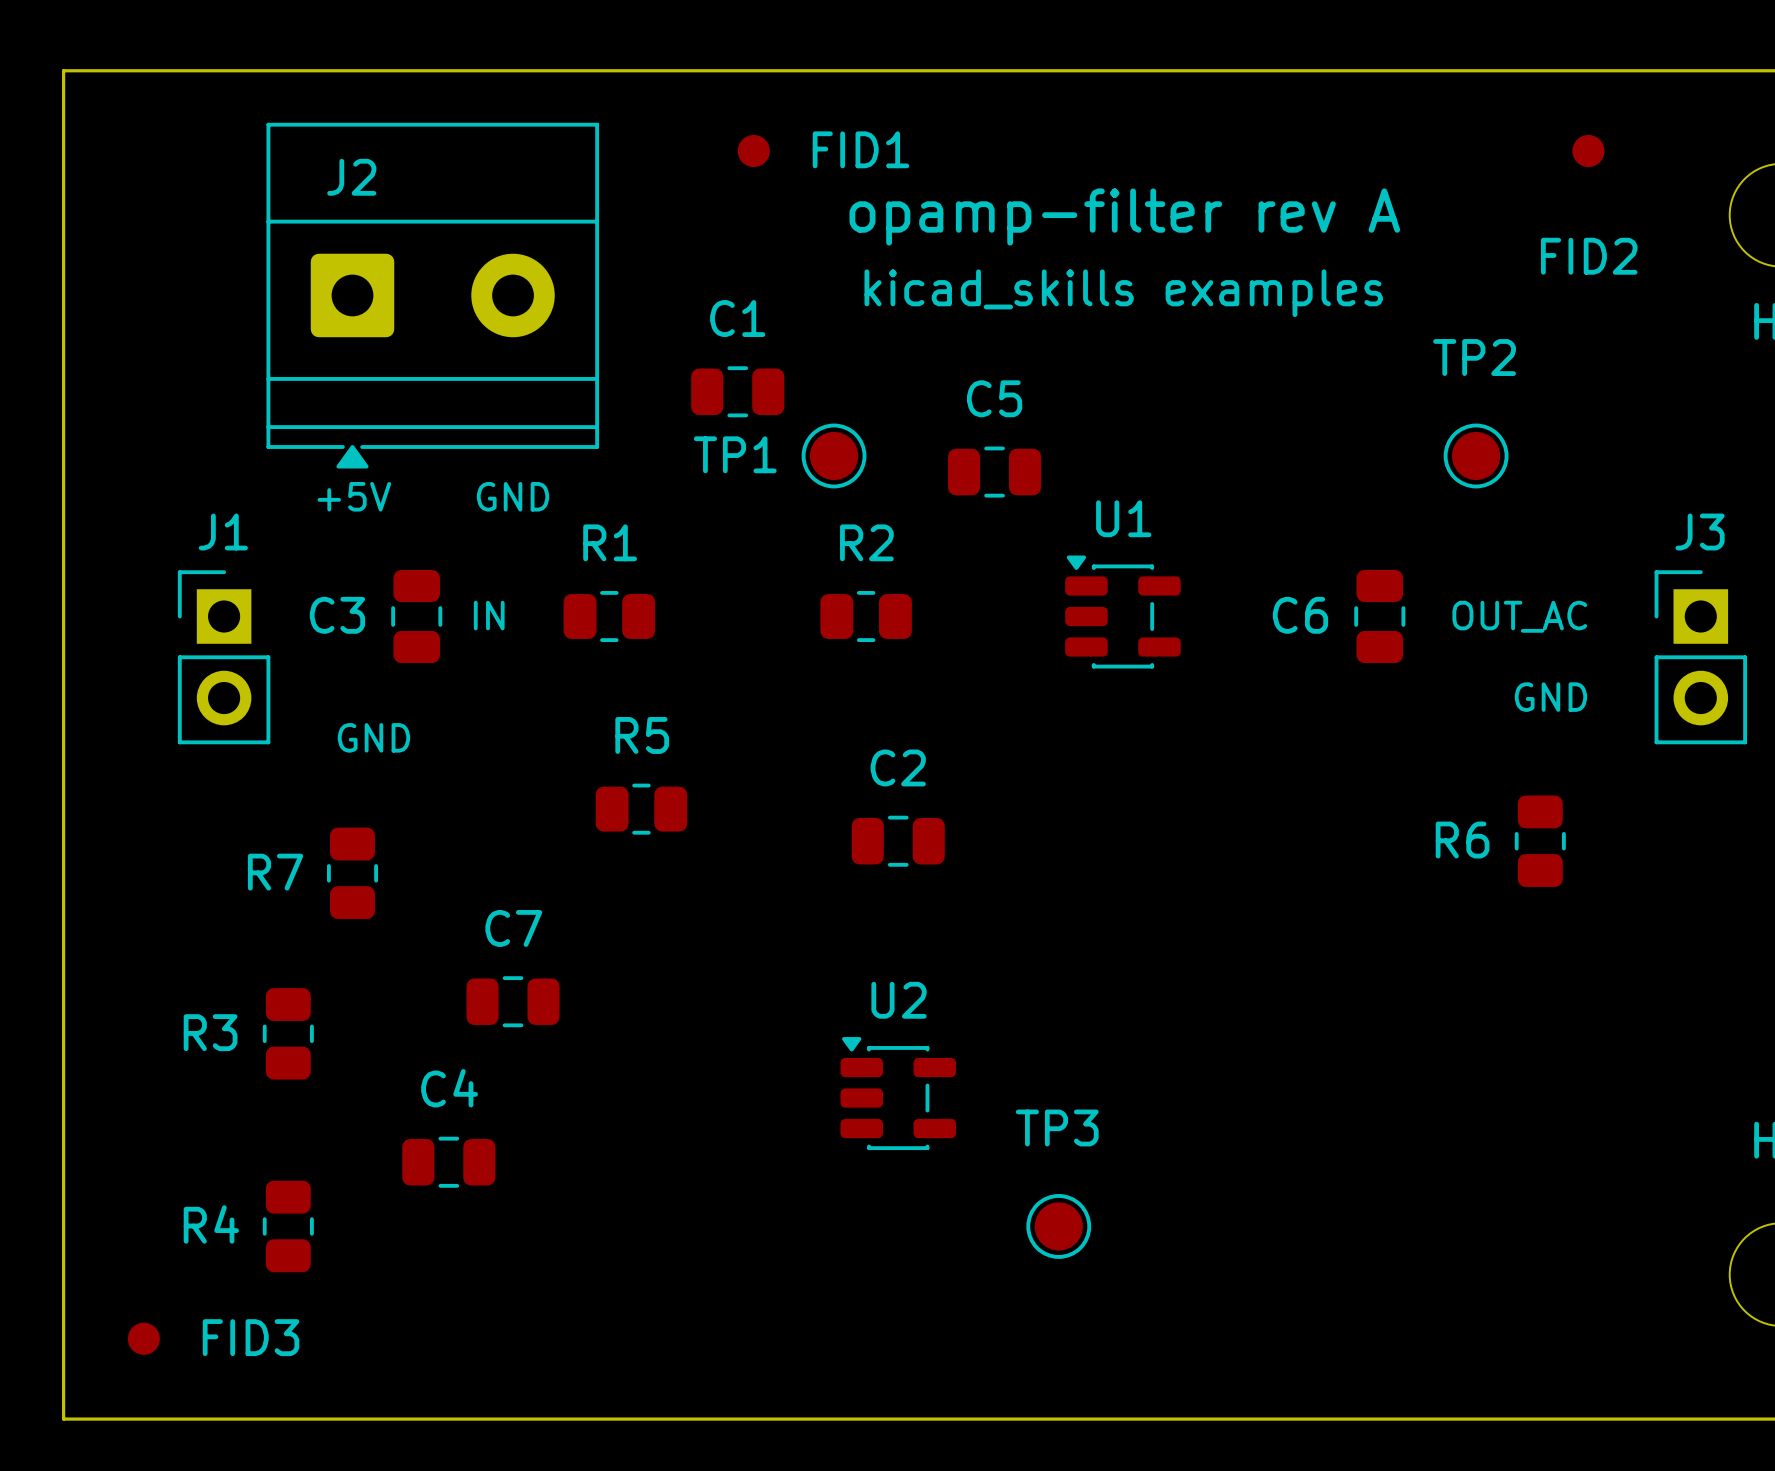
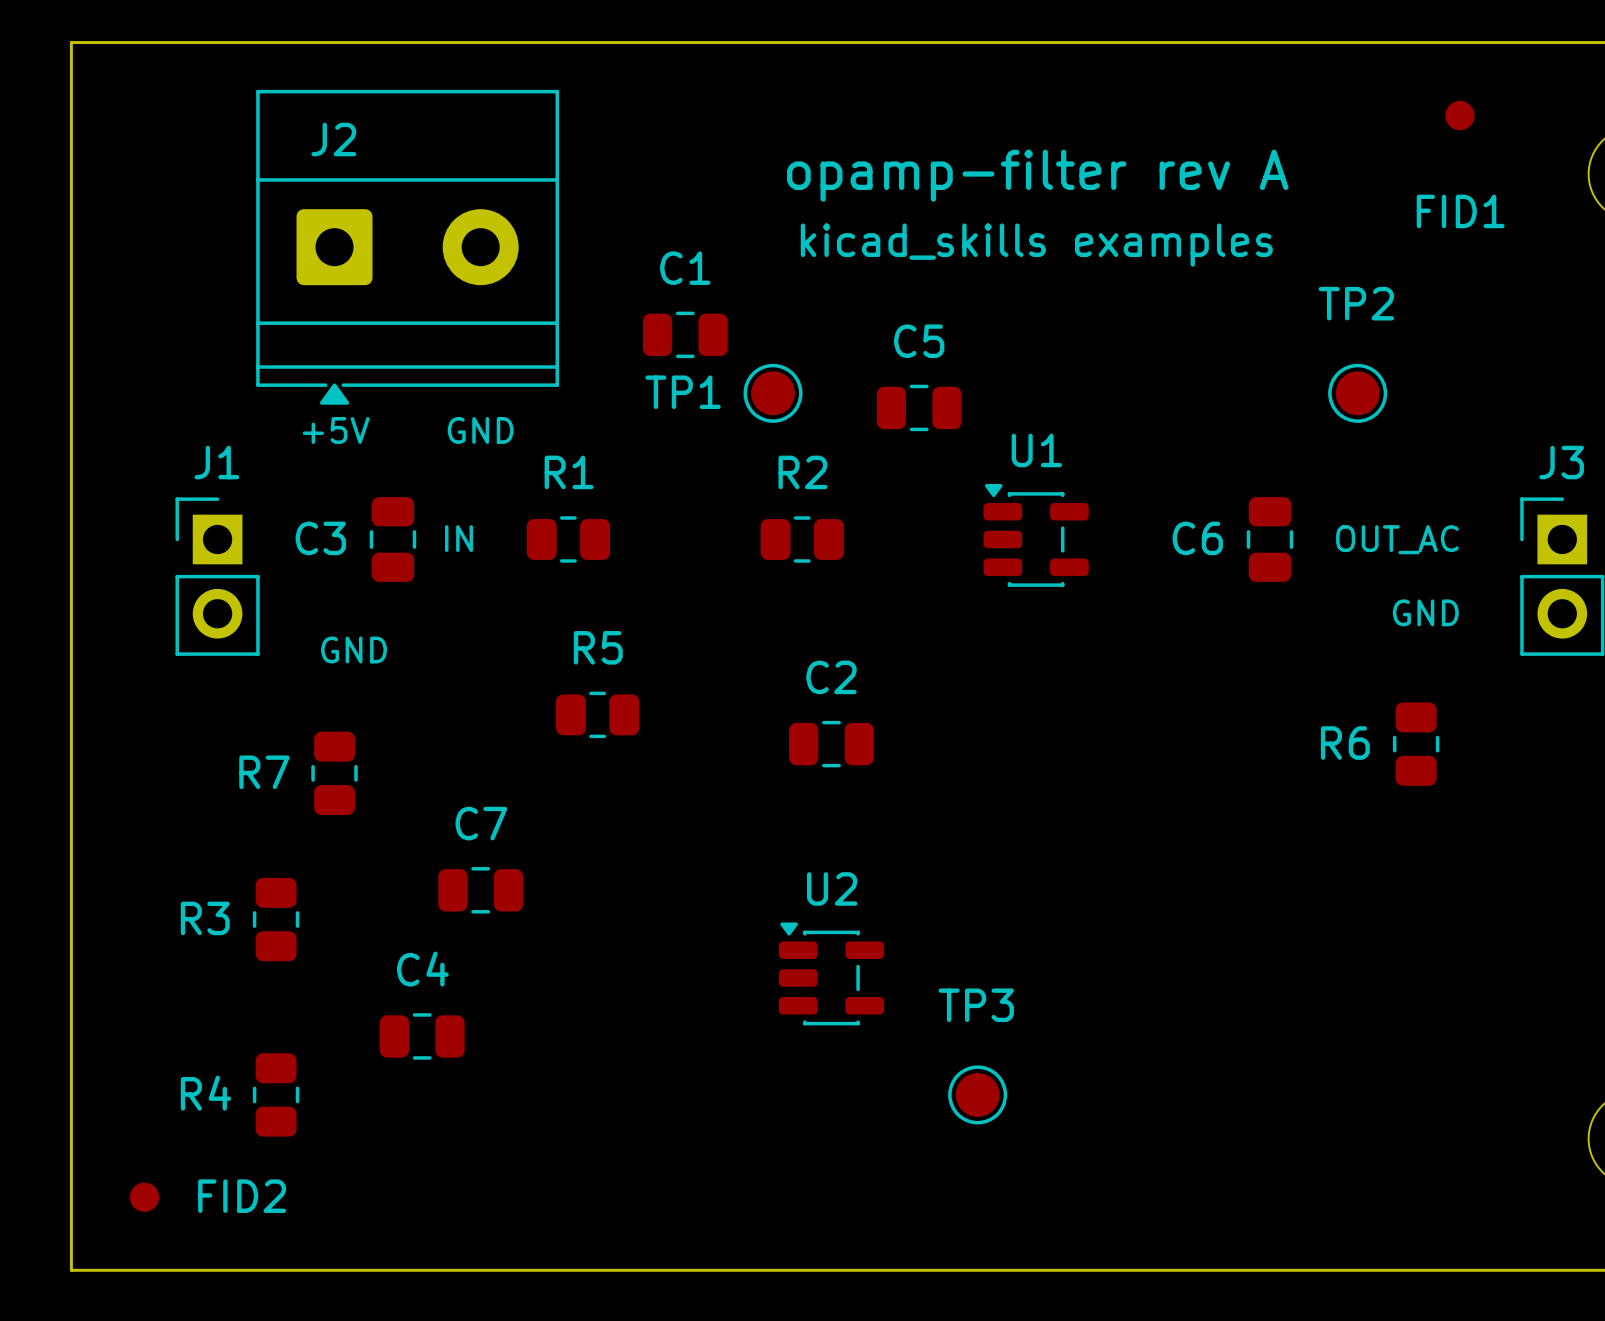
FID1: (753, 151) -> none
FID2 name: FID2 (1589, 256) -> FID1 (1460, 211)
FID3 name: FID3 (251, 1337) -> FID2 (242, 1196)

